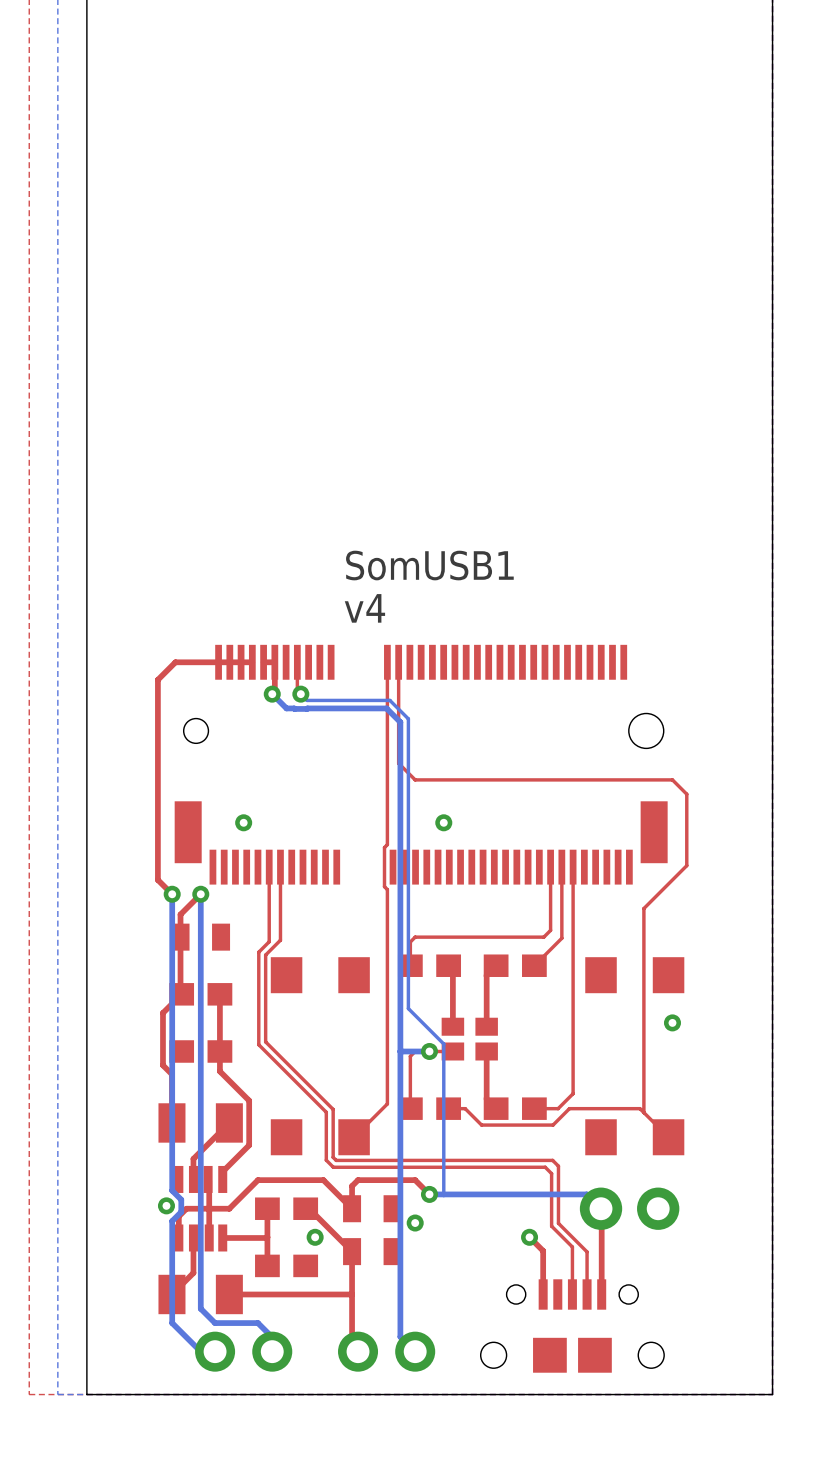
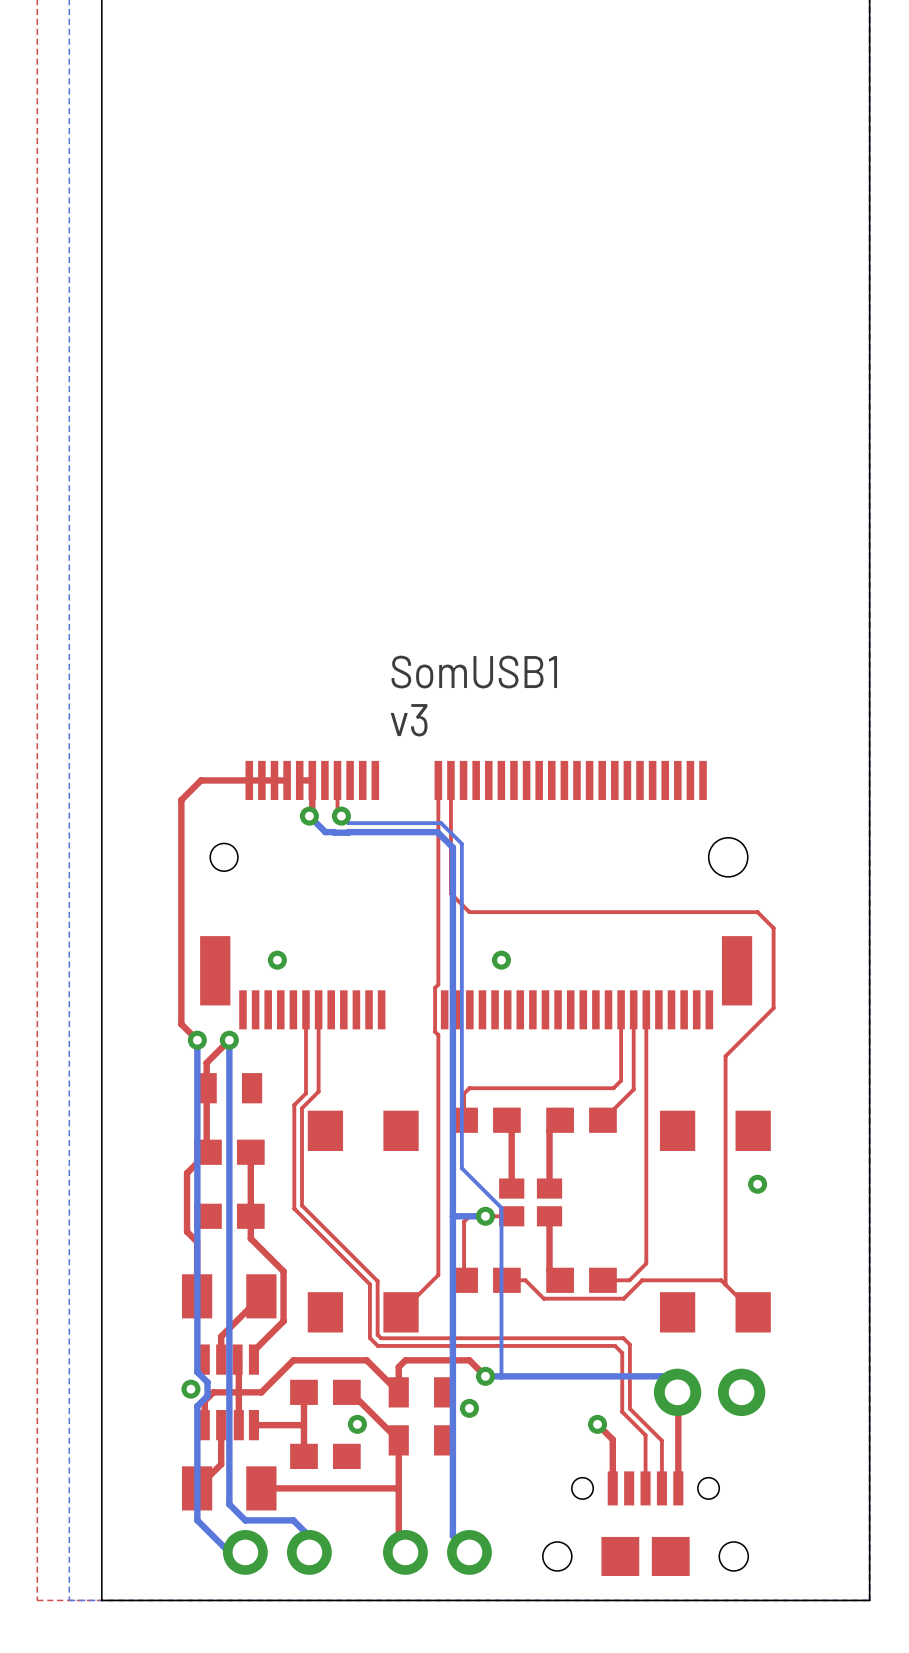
text: v4 (364, 608) -> v3 (409, 720)

